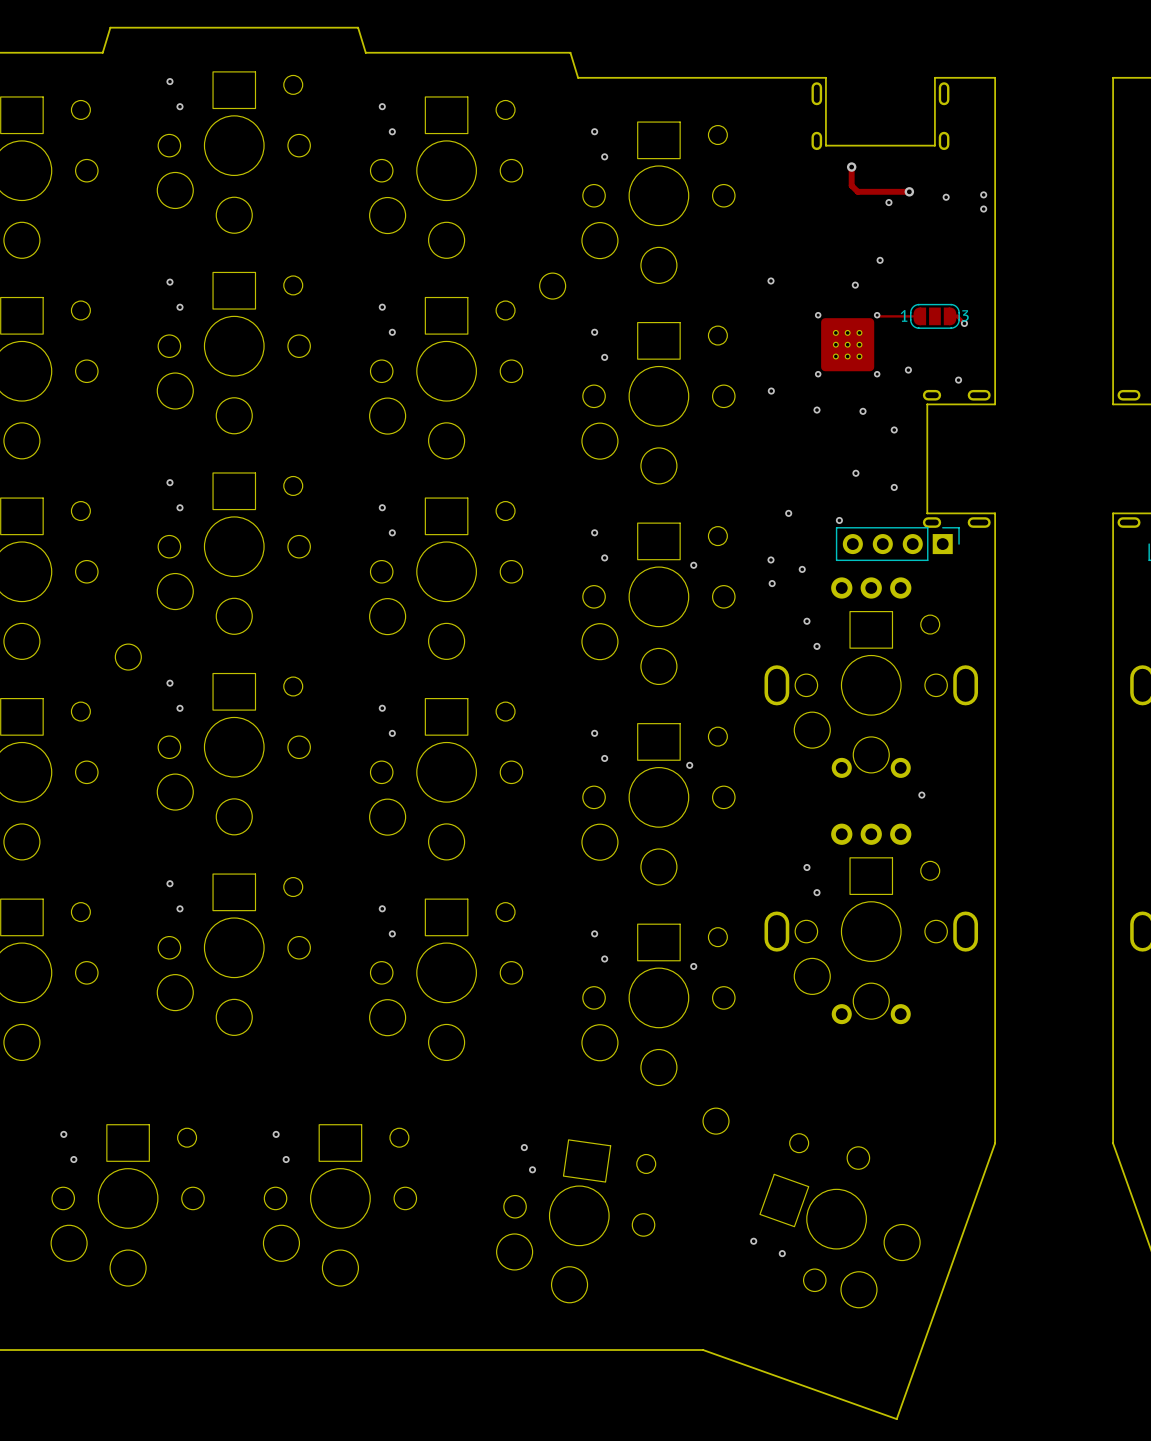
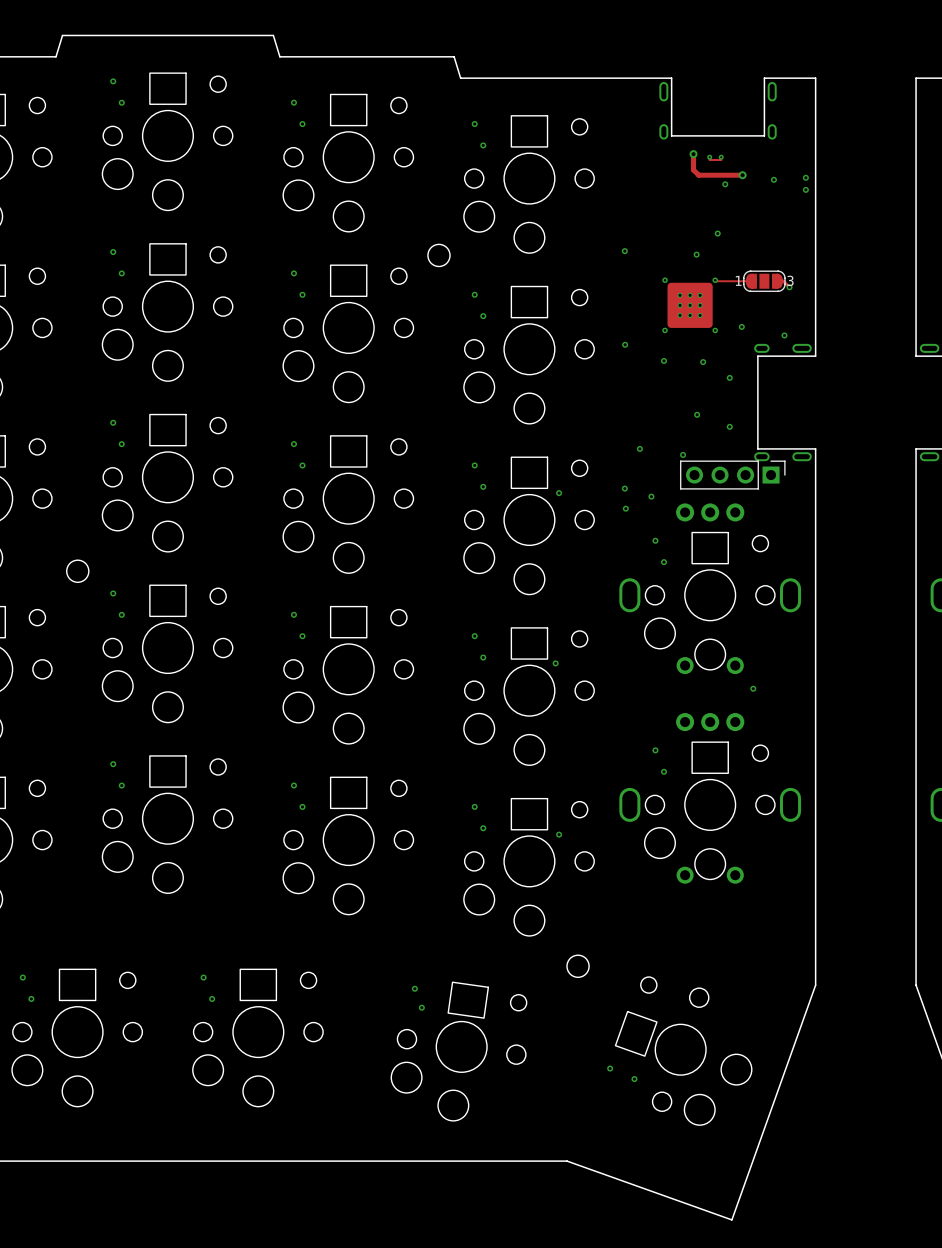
track: none -> (709, 157) (709, 159) (721, 159) (721, 157)
via: none -> (709, 157)
via: none -> (721, 157)

